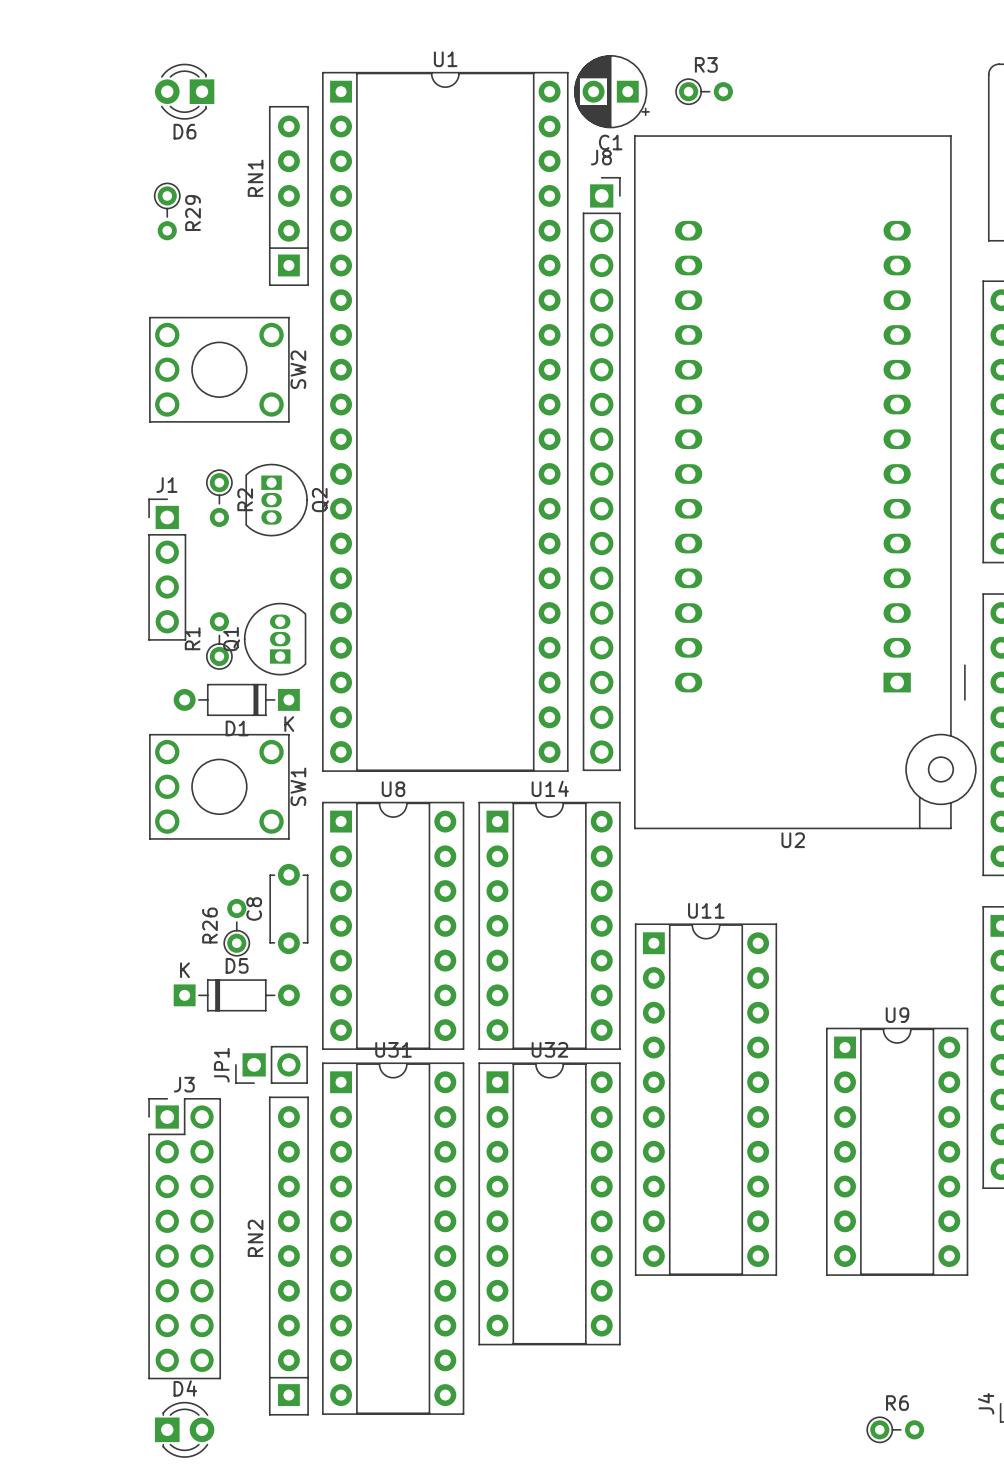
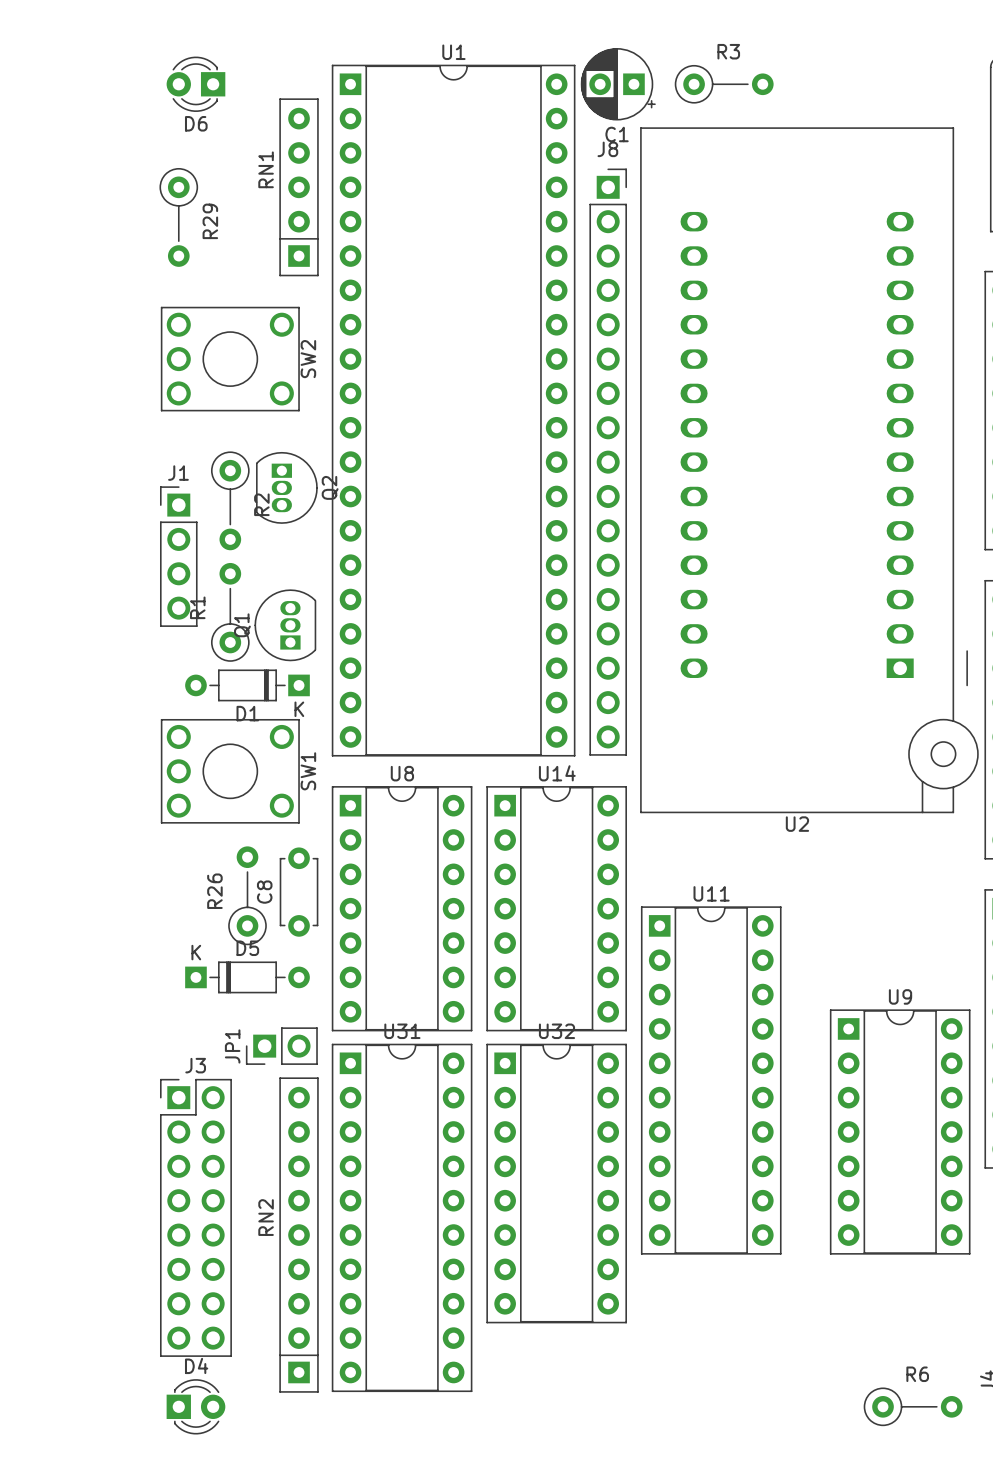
R3 footprint: [675, 78, 733, 106] -> [674, 64, 774, 104]
R29 footprint: [153, 182, 181, 241] -> [159, 167, 199, 267]
R2 footprint: [205, 469, 233, 528] -> [210, 451, 250, 551]
R1 footprint: [205, 612, 233, 670] -> [210, 562, 250, 662]
R26 footprint: [223, 898, 251, 957] -> [228, 846, 267, 946]
R6 footprint: [866, 1416, 925, 1444] -> [863, 1387, 963, 1427]

